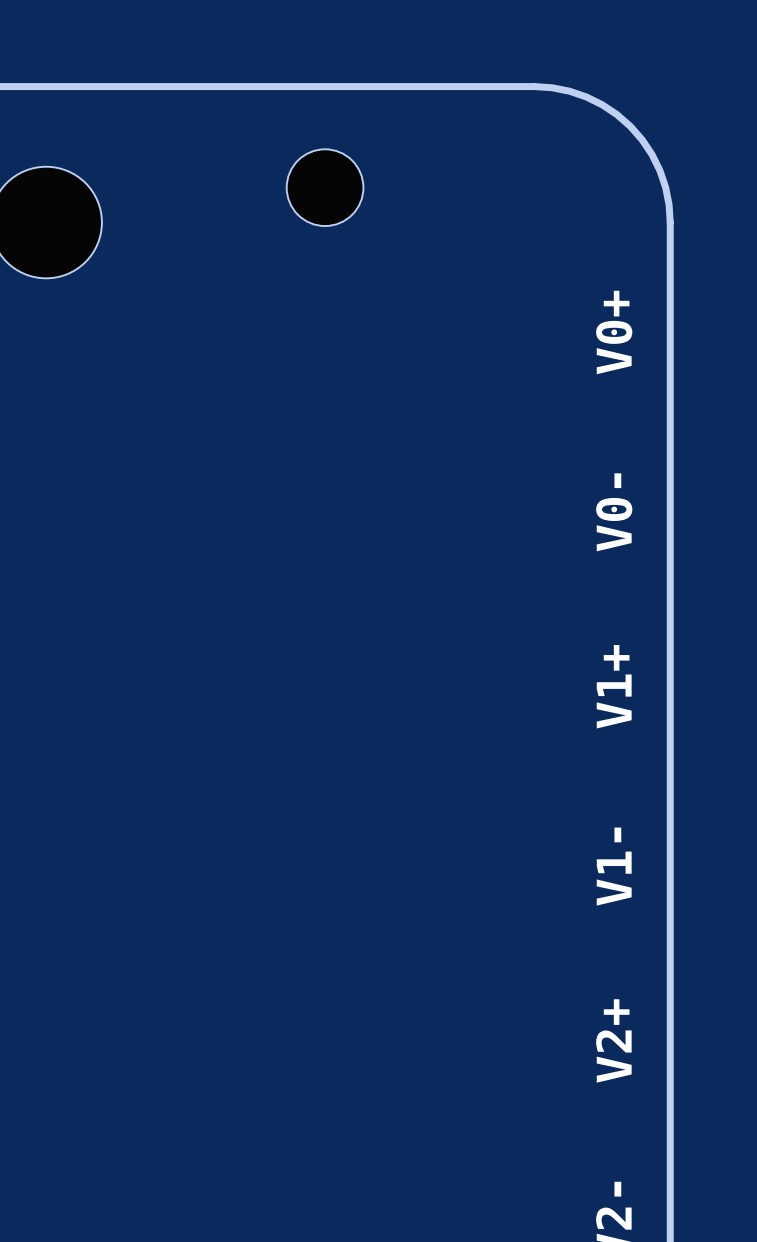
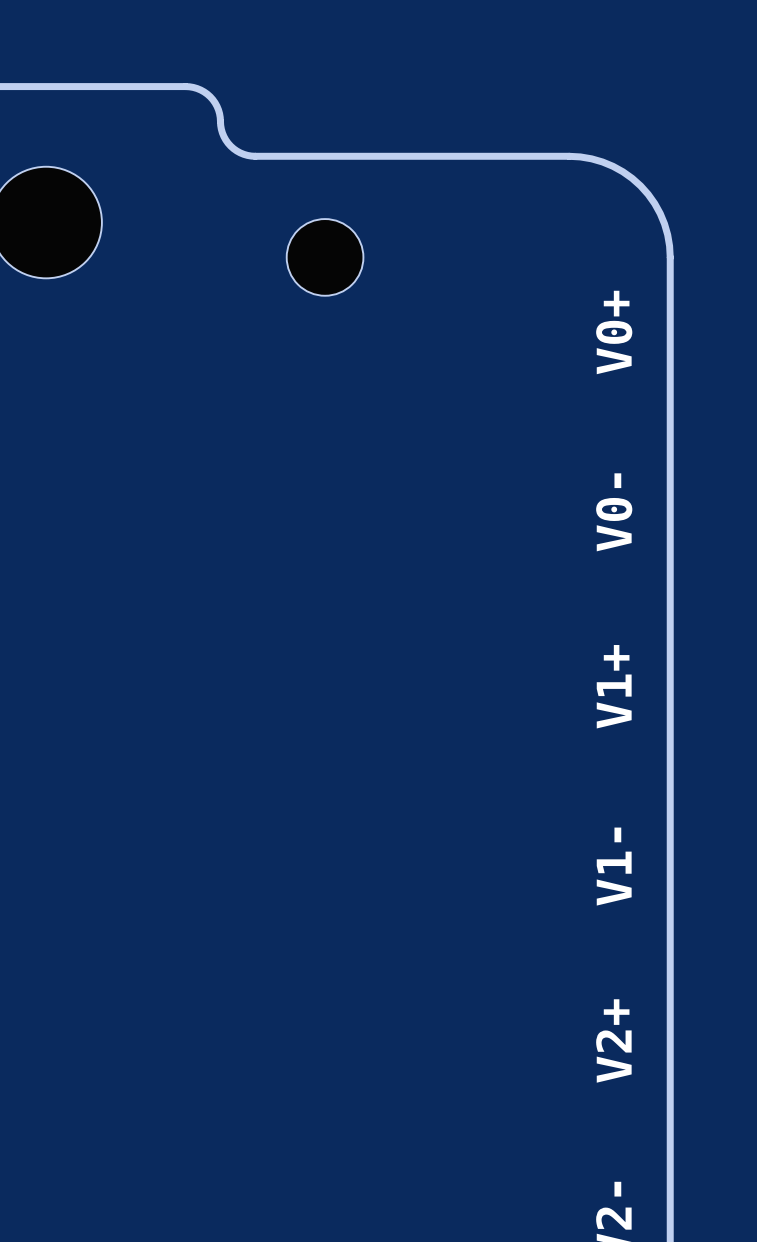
board edge: (185, 86) (534, 86) (552, 87) (586, 96) (617, 114) (642, 139) (652, 154) (665, 187) (669, 204) (670, 257) -> (185, 86) (200, 90) (210, 96) (218, 109) (221, 129) (225, 139) (233, 148) (247, 155) (569, 156) (602, 161) (632, 178) (648, 194) (664, 224) (670, 257)
part position: (325, 187) -> (325, 257)

